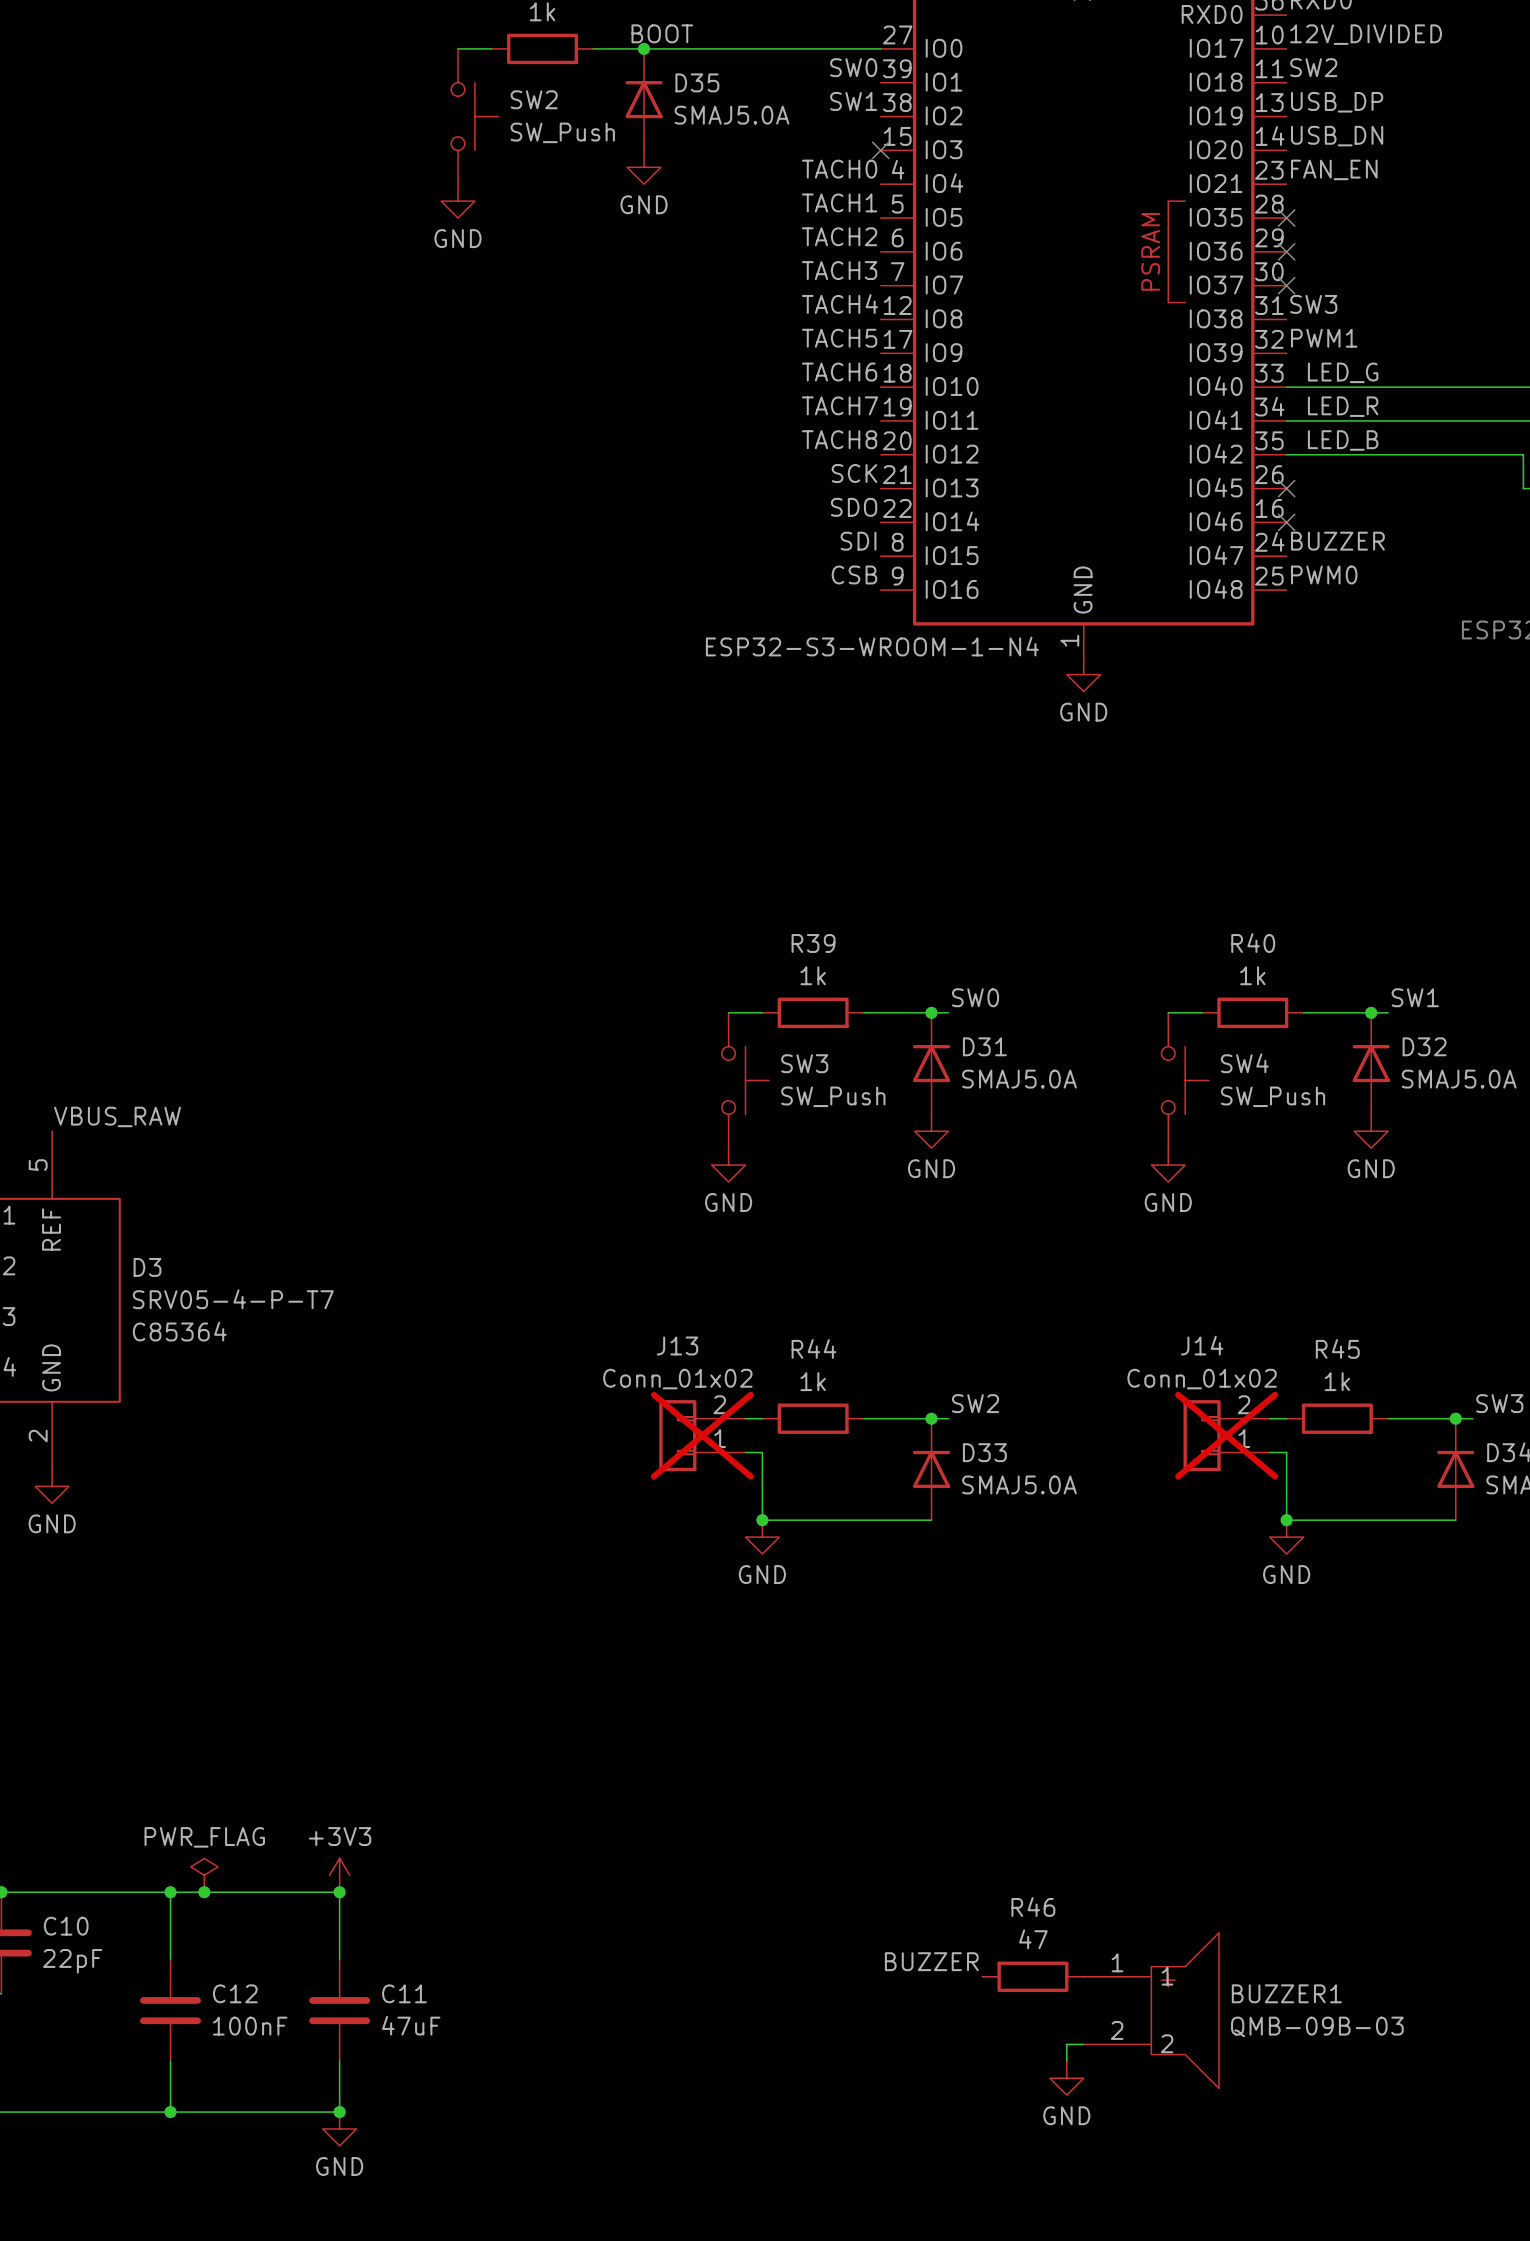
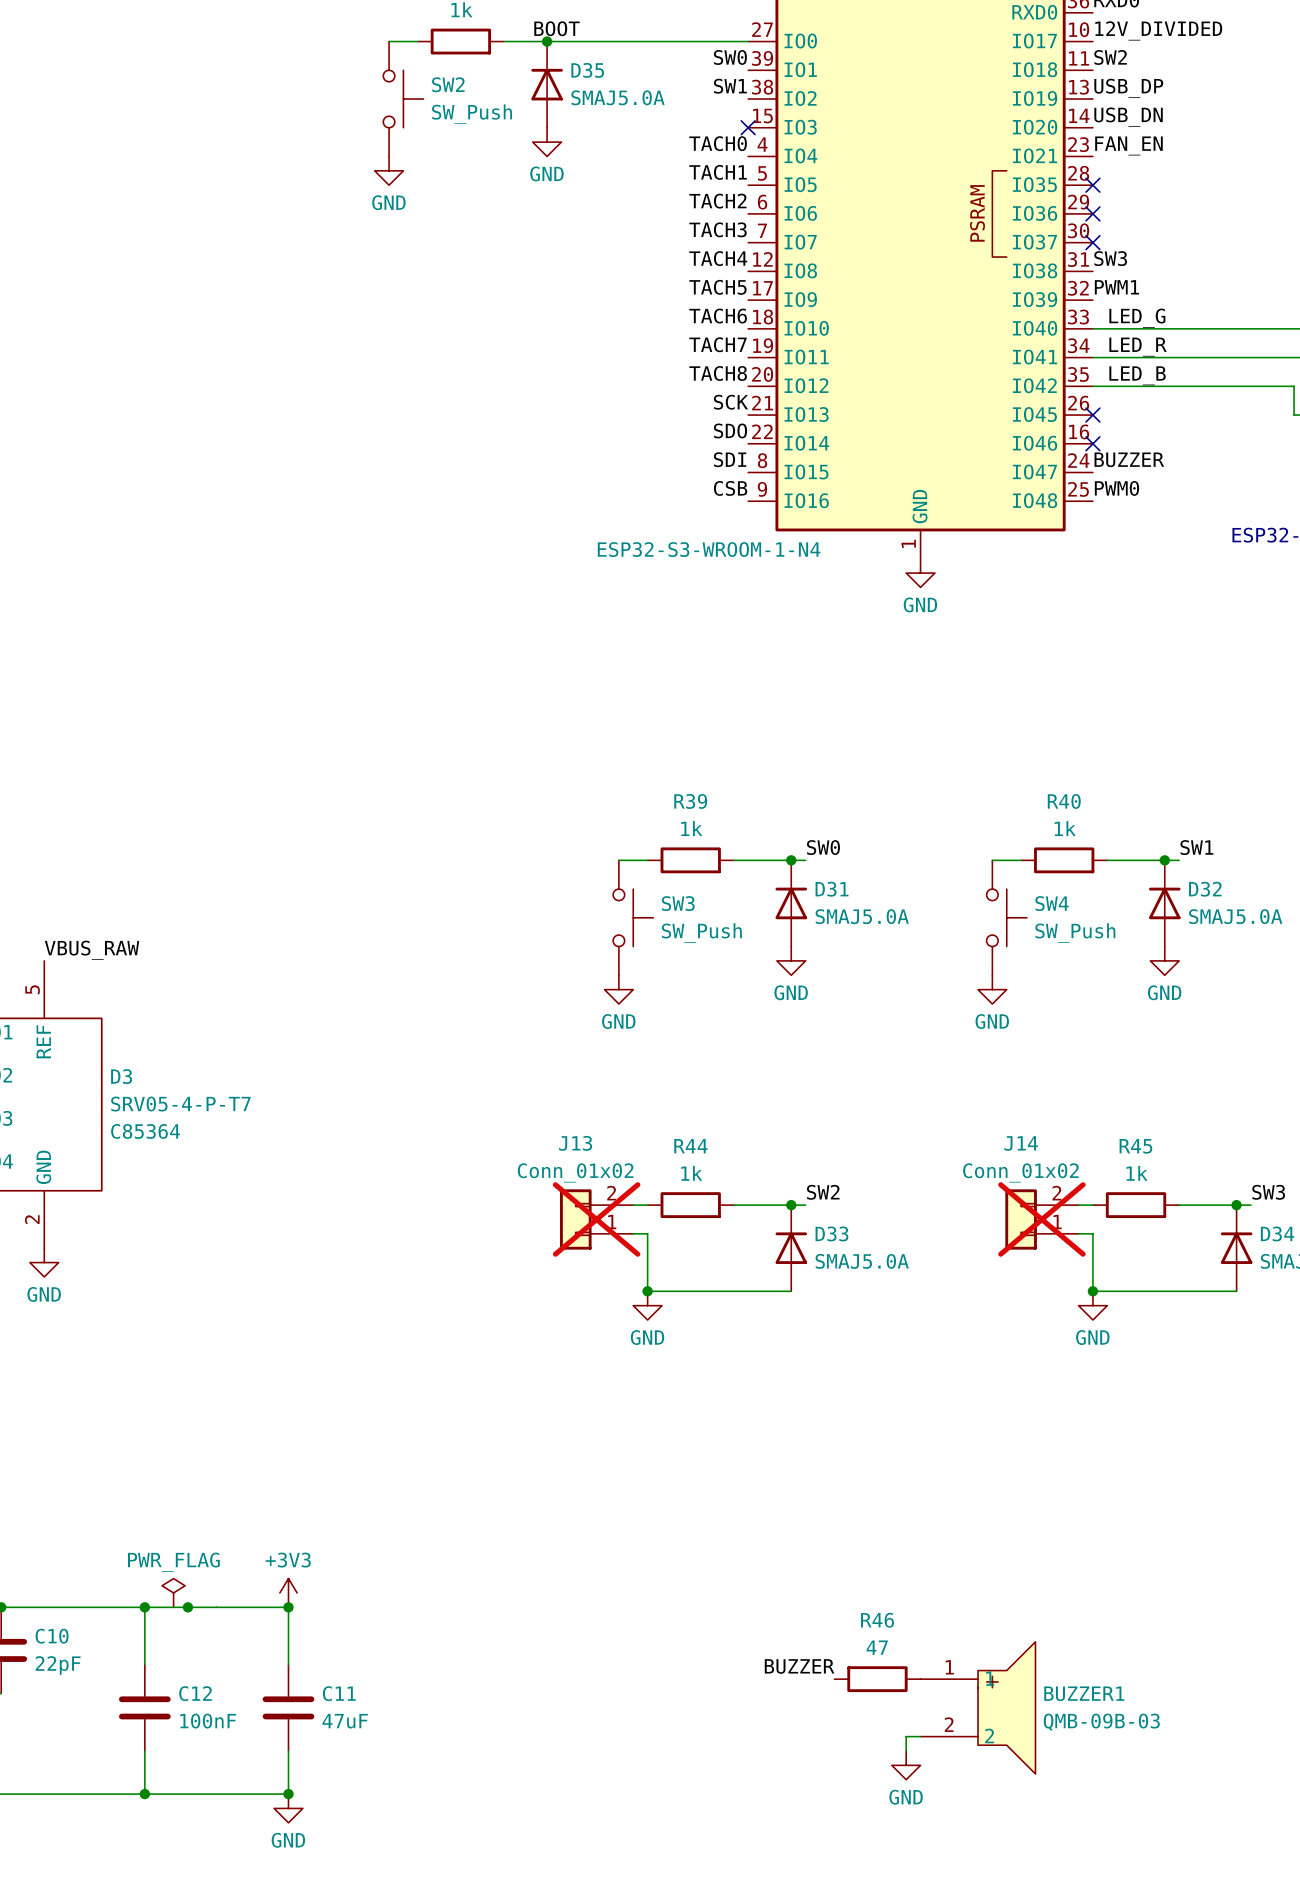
junction position: (204, 1892) -> (187, 1607)

